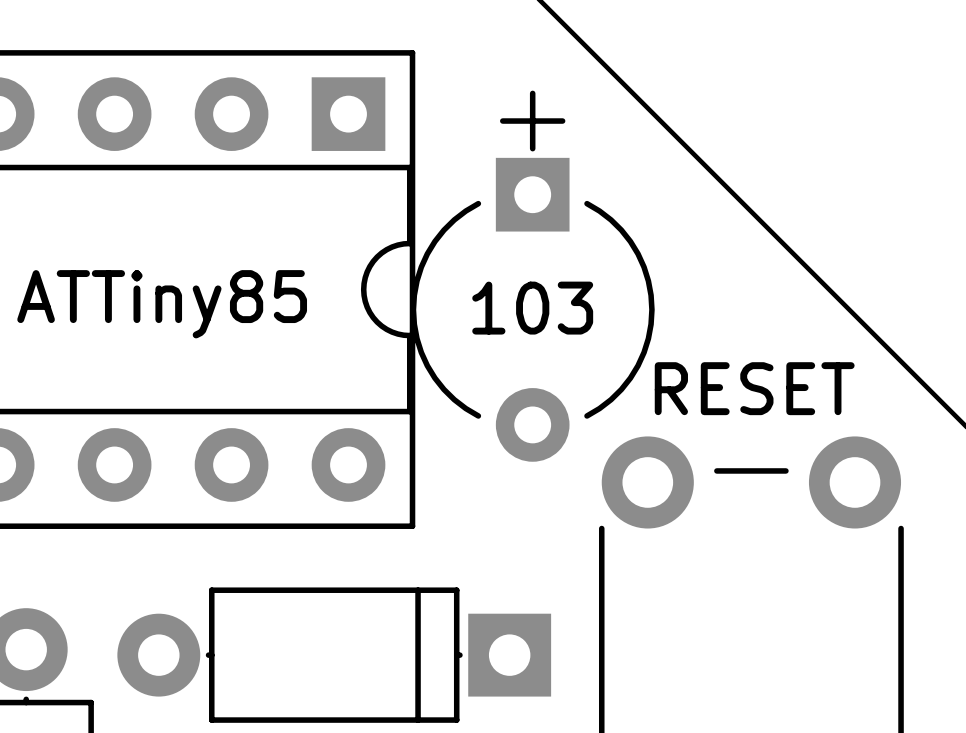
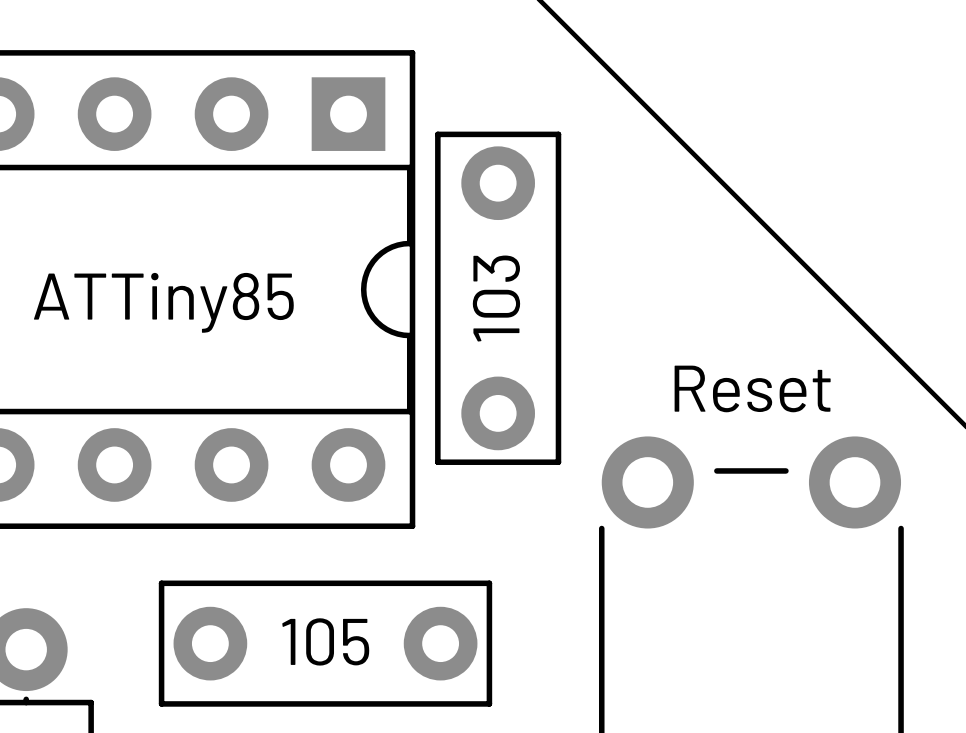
part footprint: [410, 90, 655, 462] -> [435, 131, 562, 465]
part value: RESET (754, 388) -> Reset (752, 388)
part footprint: [117, 587, 552, 723] -> [158, 580, 493, 707]
part value: none -> 105 (325, 641)

